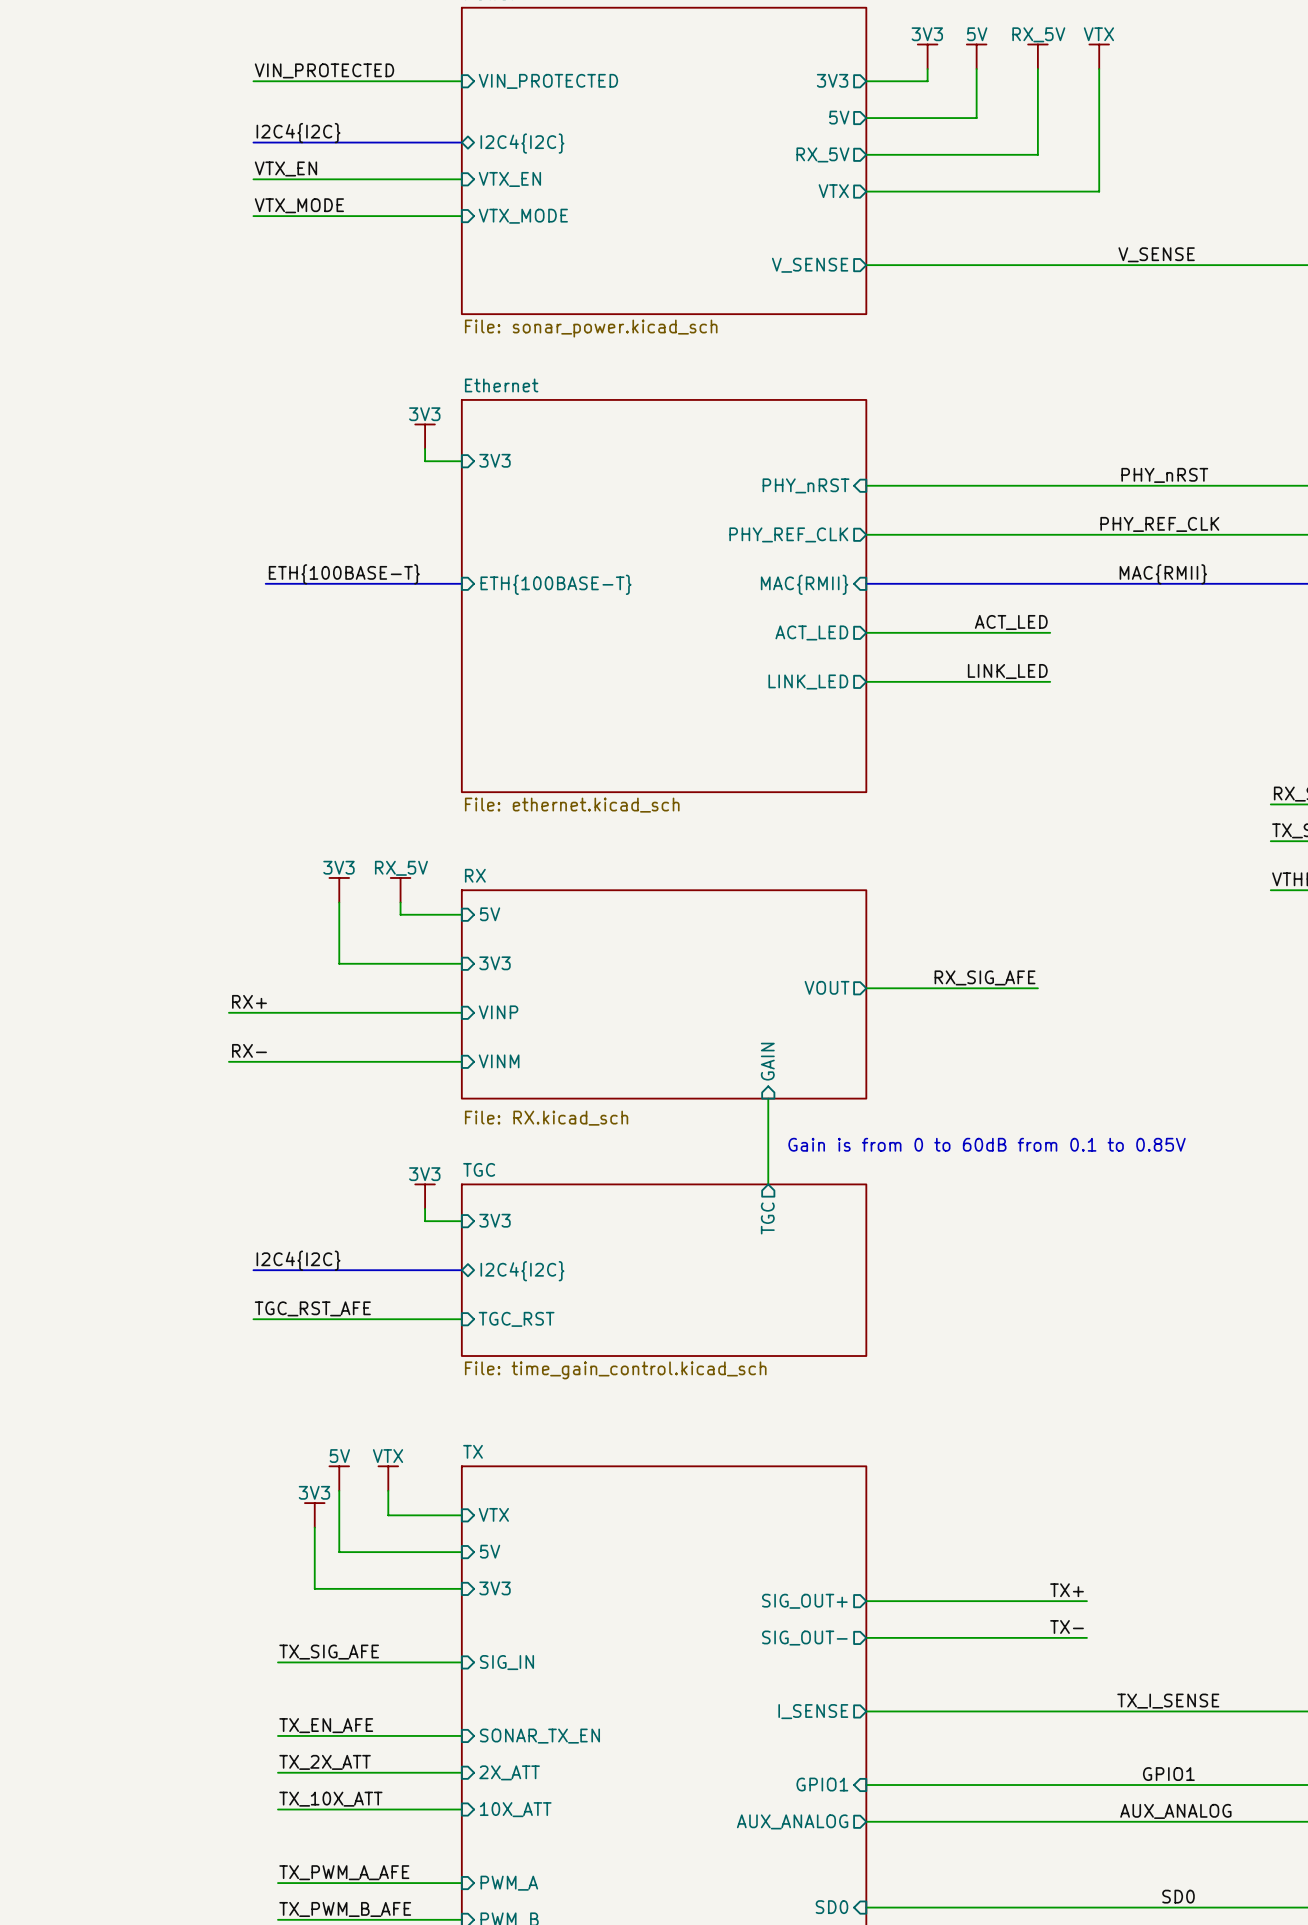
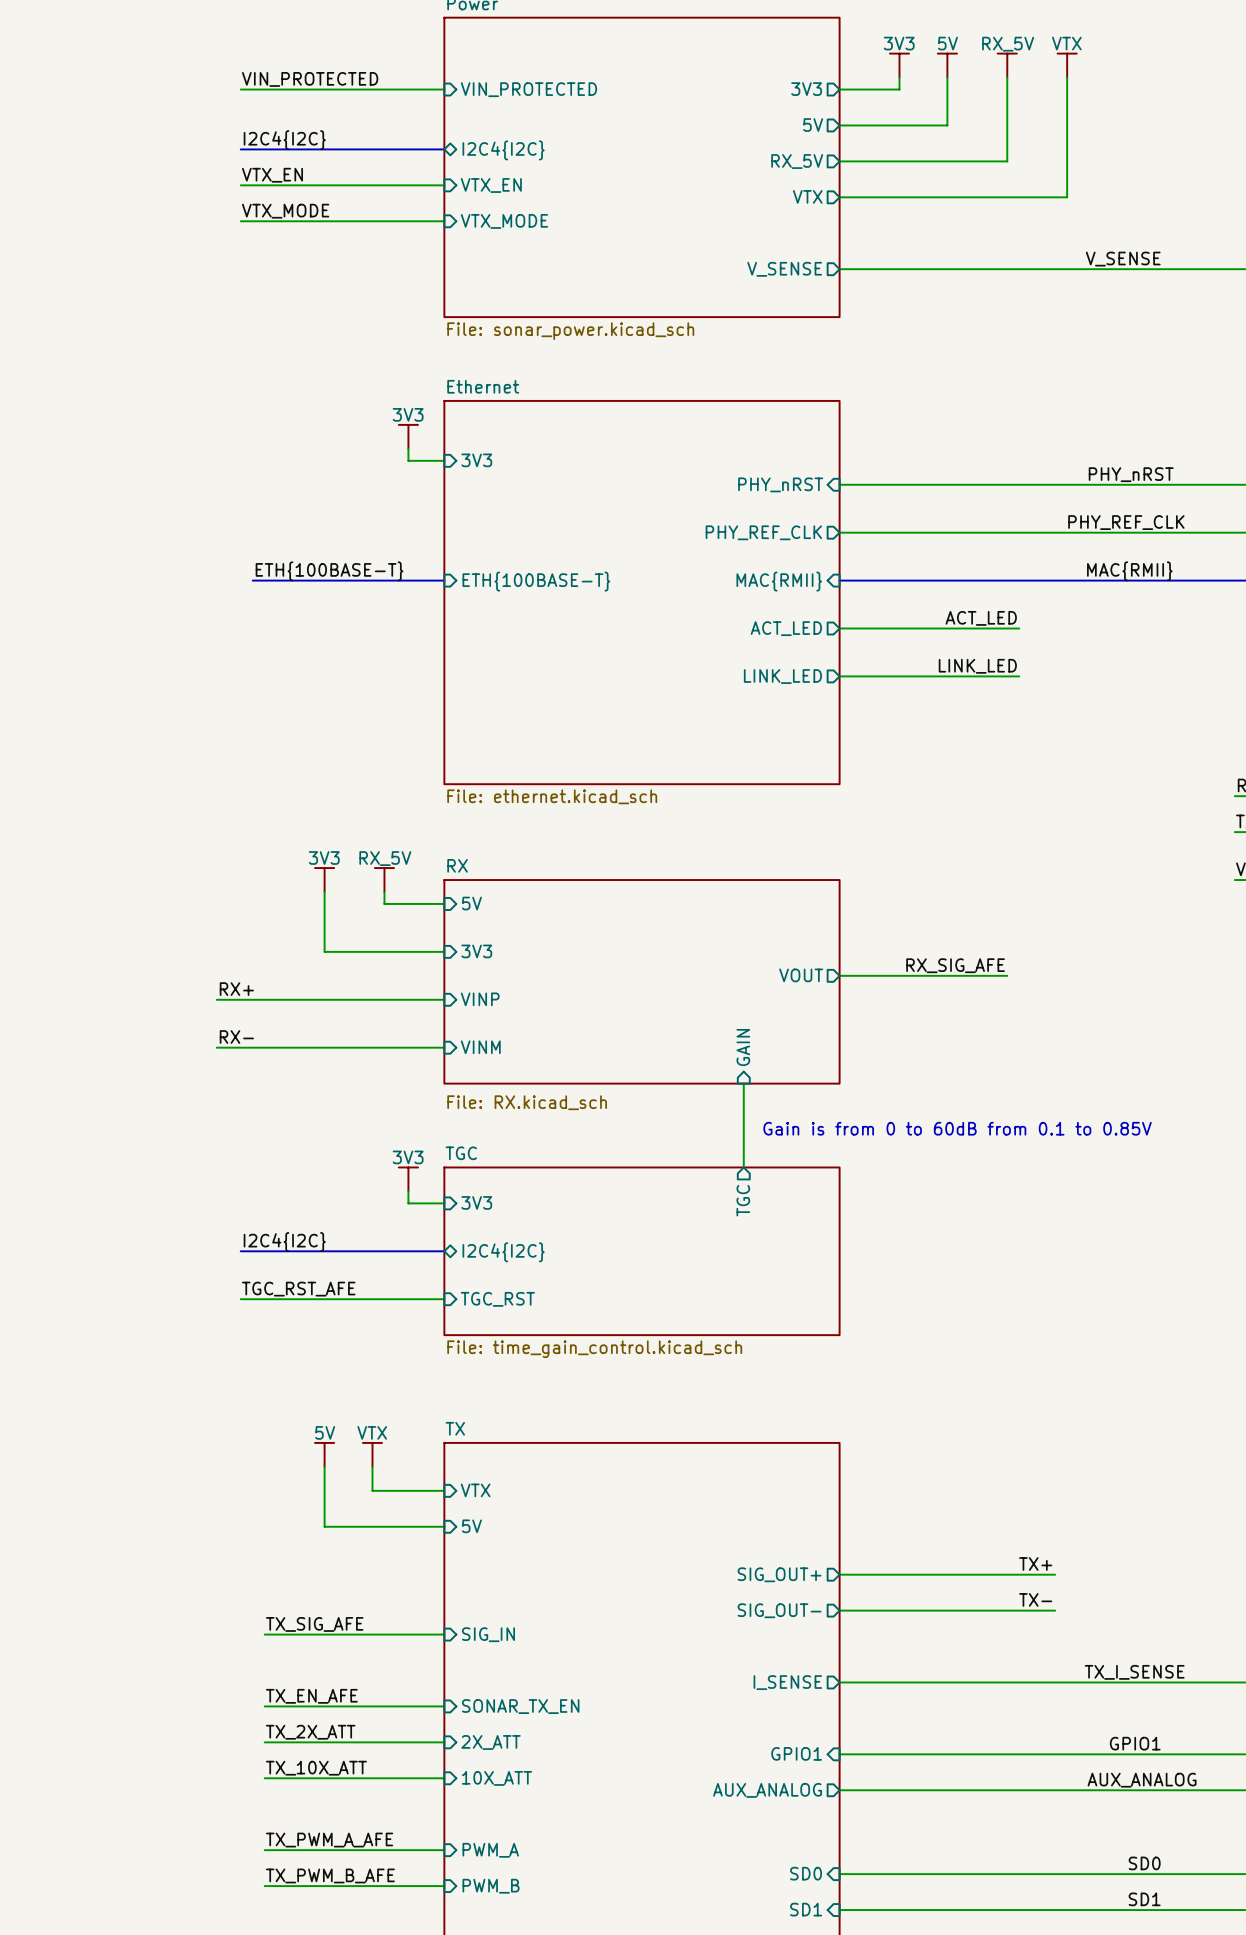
power symbol: 3V3 (314, 1515) -> none
wire: (314, 1527) (314, 1588) (461, 1588) -> none
sheet pin: 3V3 (495, 1588) -> none

